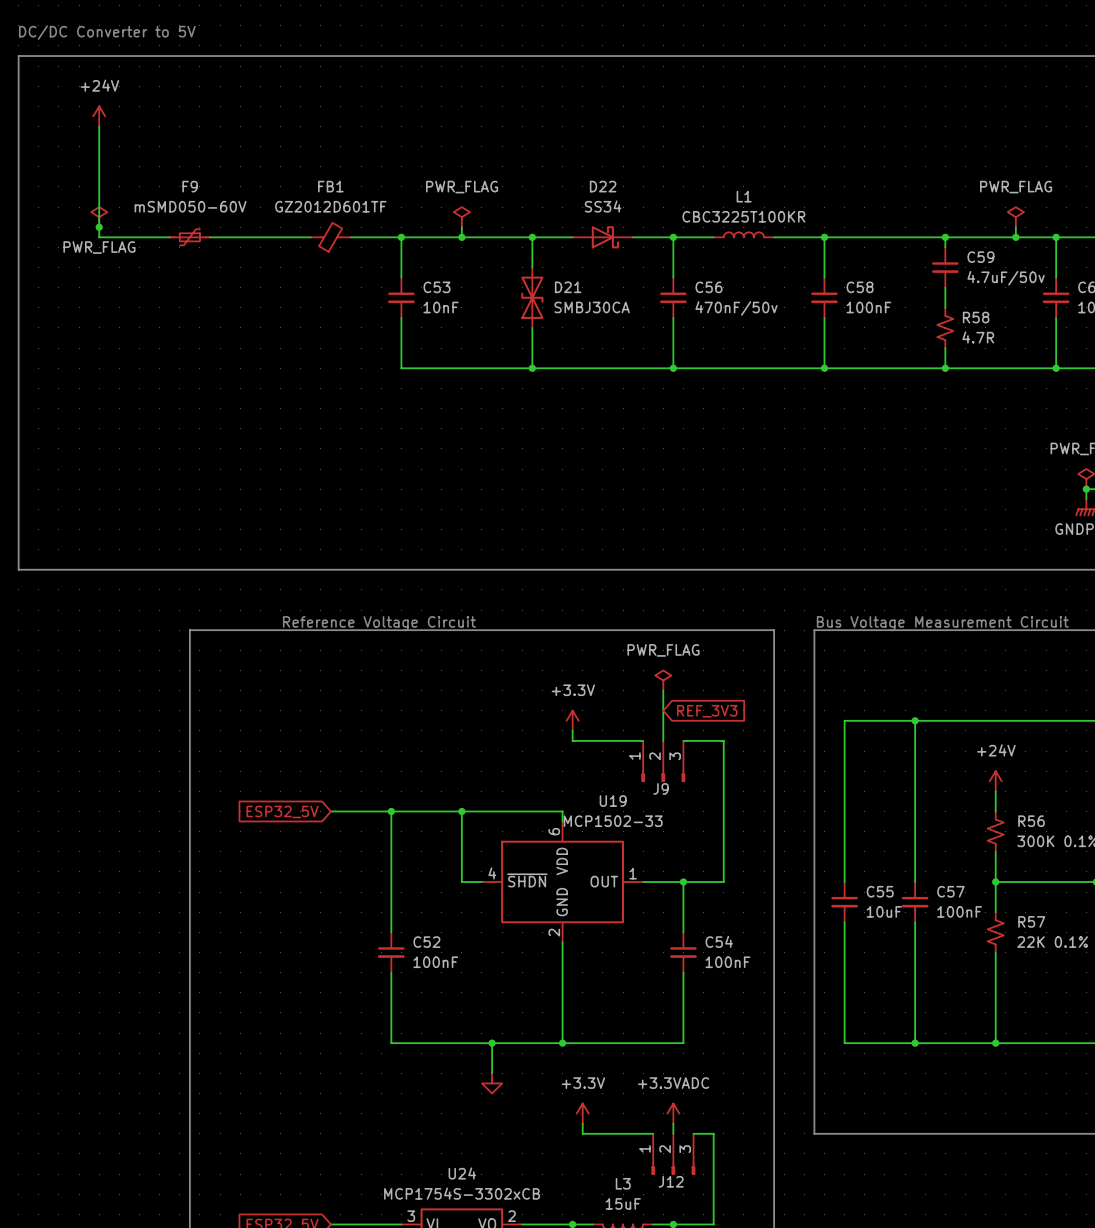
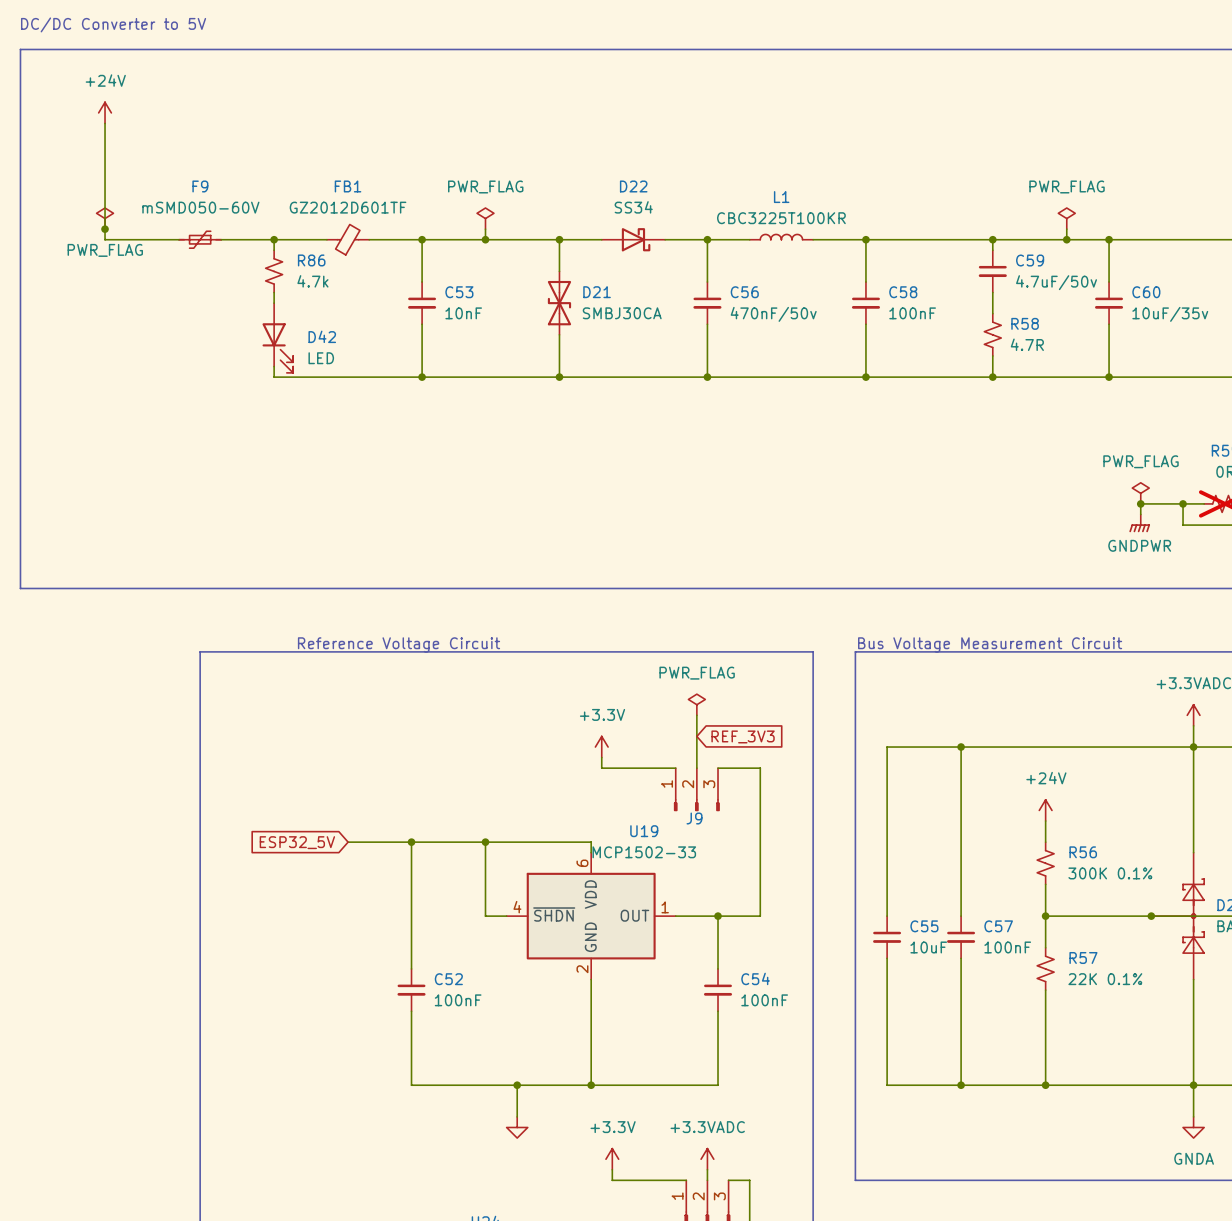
wire: none -> (274, 239) (274, 250)
junction: none -> (274, 239)
R86: none -> 4.7k (274, 271)
wire: none -> (274, 292) (274, 303)
D42: none -> LED (277, 338)
wire: none -> (274, 366) (274, 377) (422, 377)
junction: none -> (422, 377)

